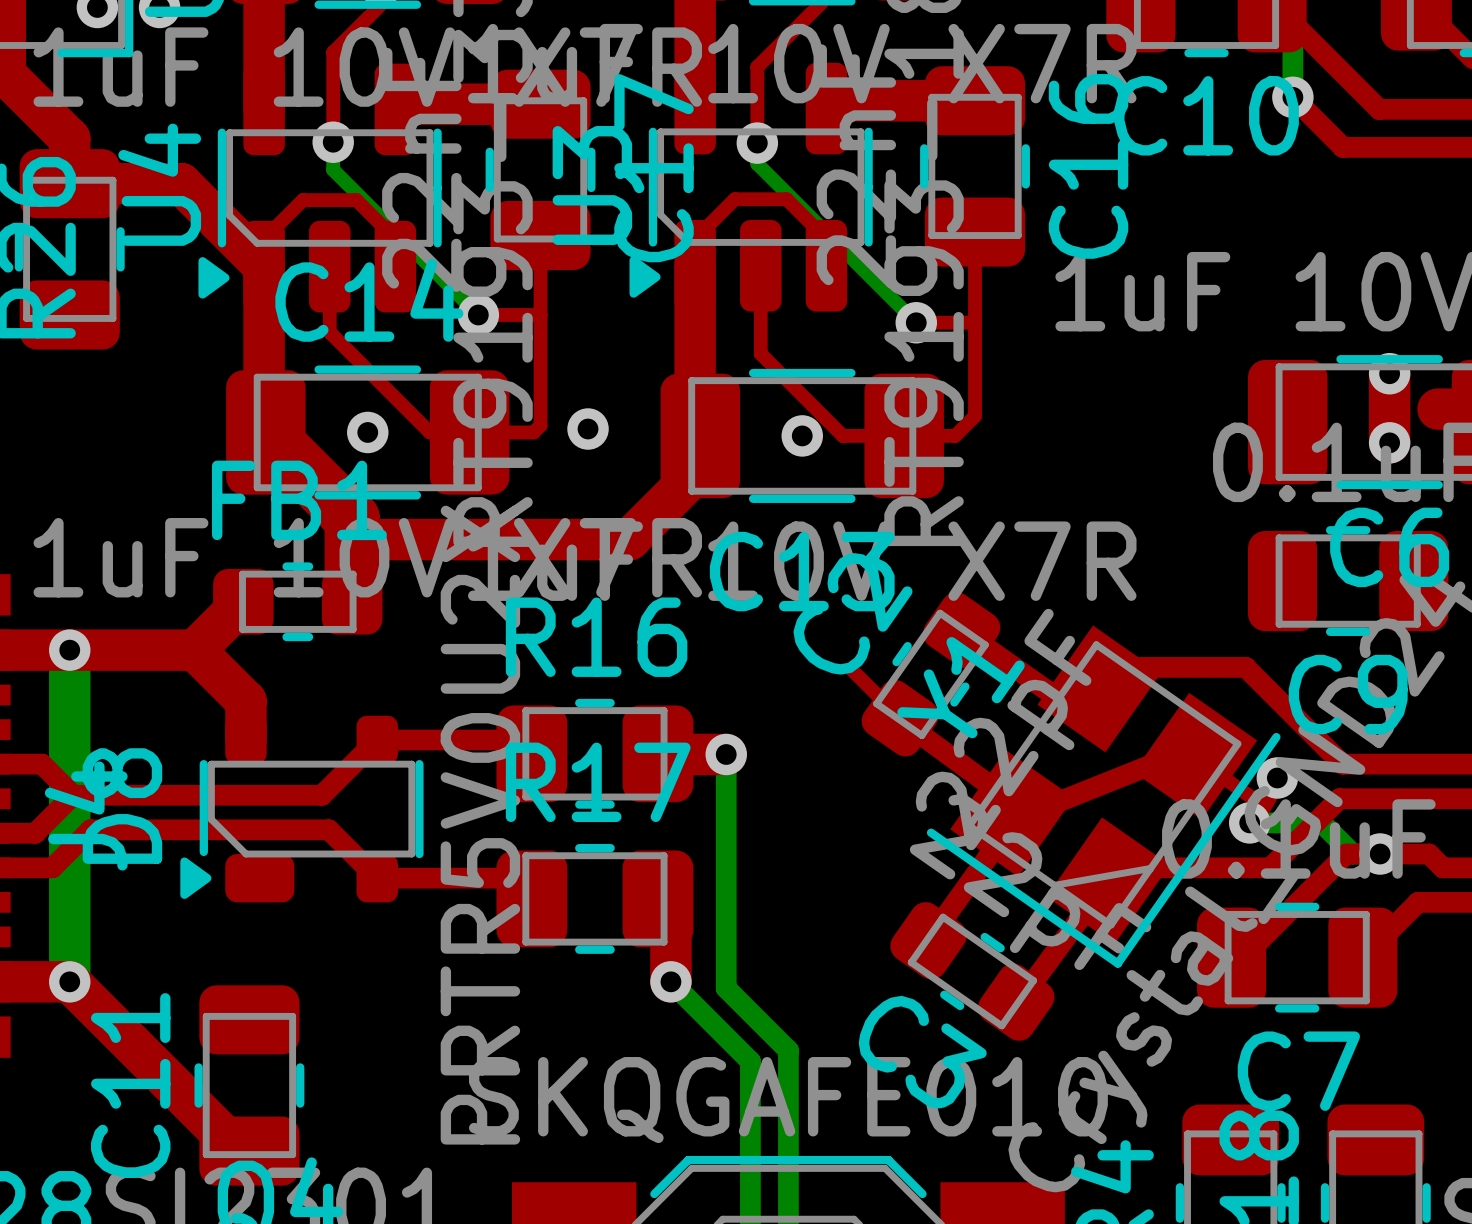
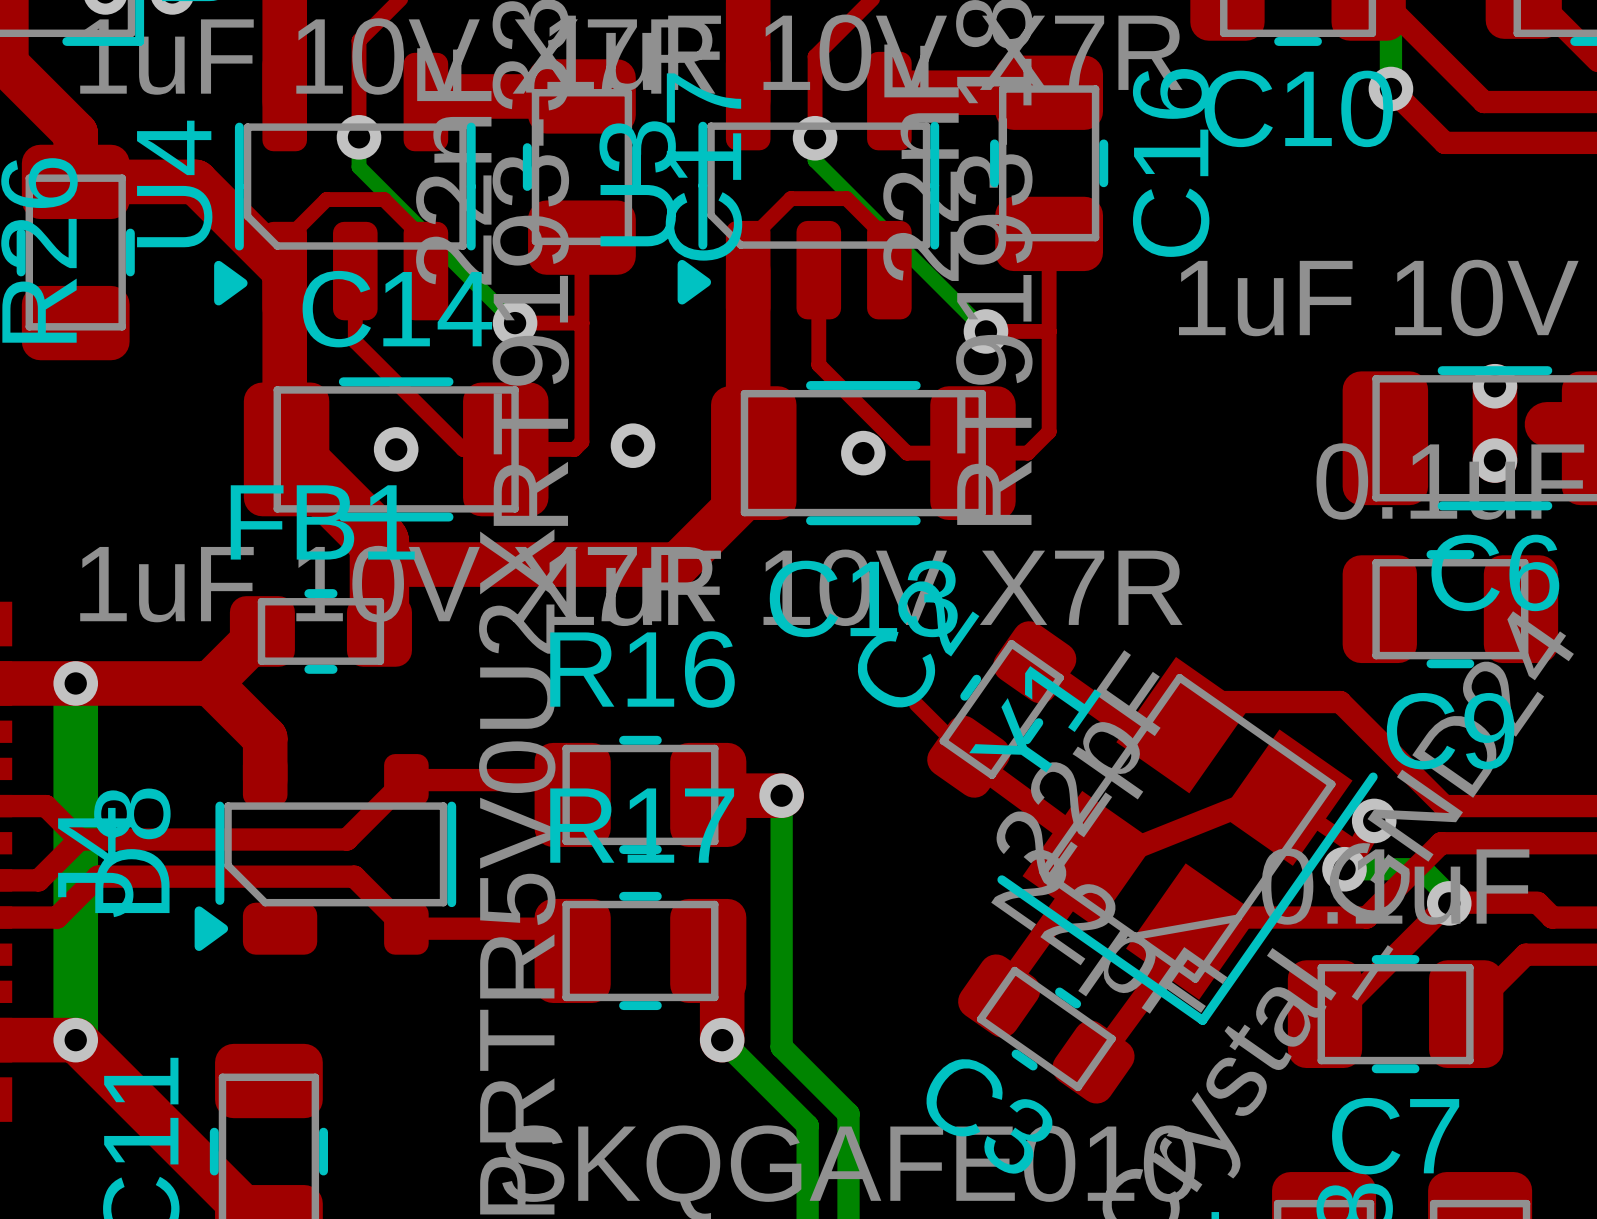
via position: (1380, 854) -> (1449, 903)

